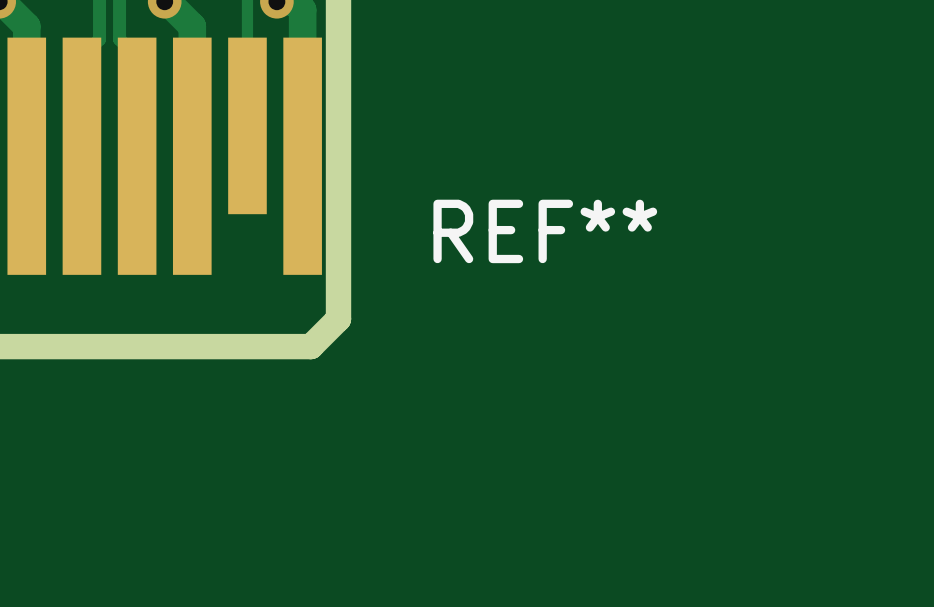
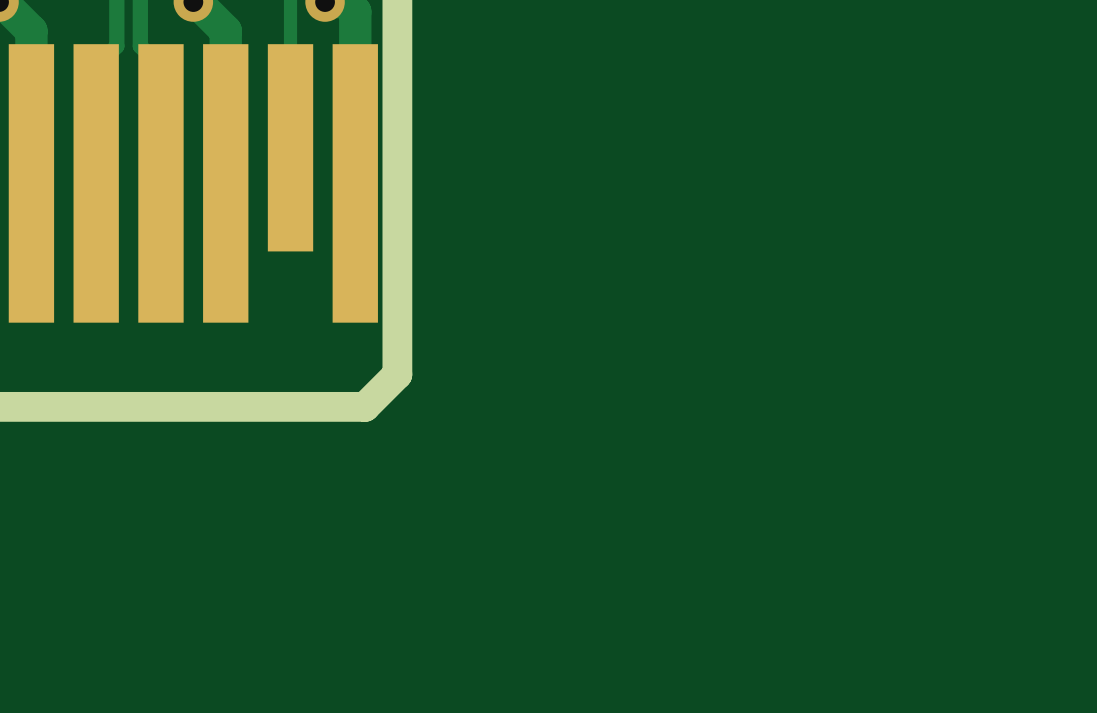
REF**: (545, 231) -> none

